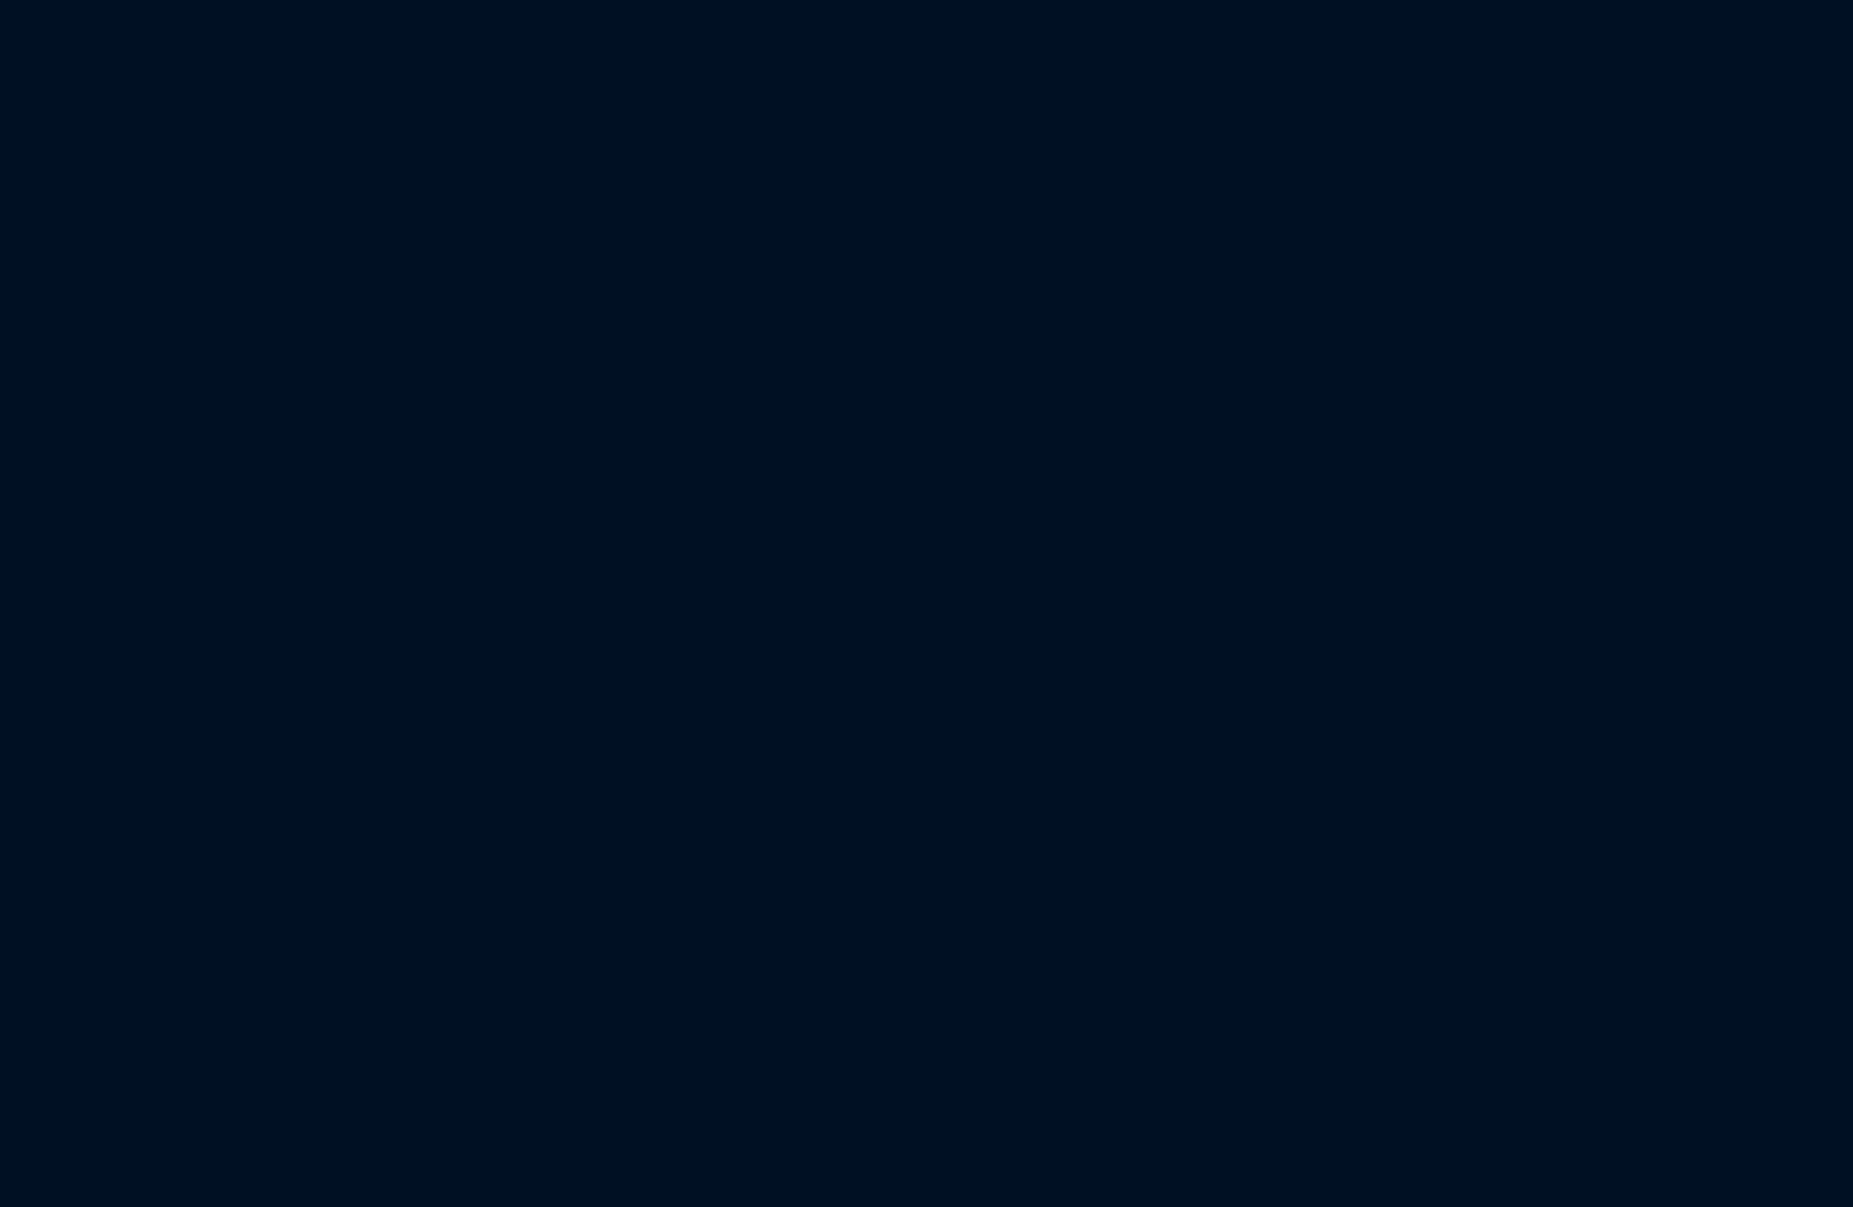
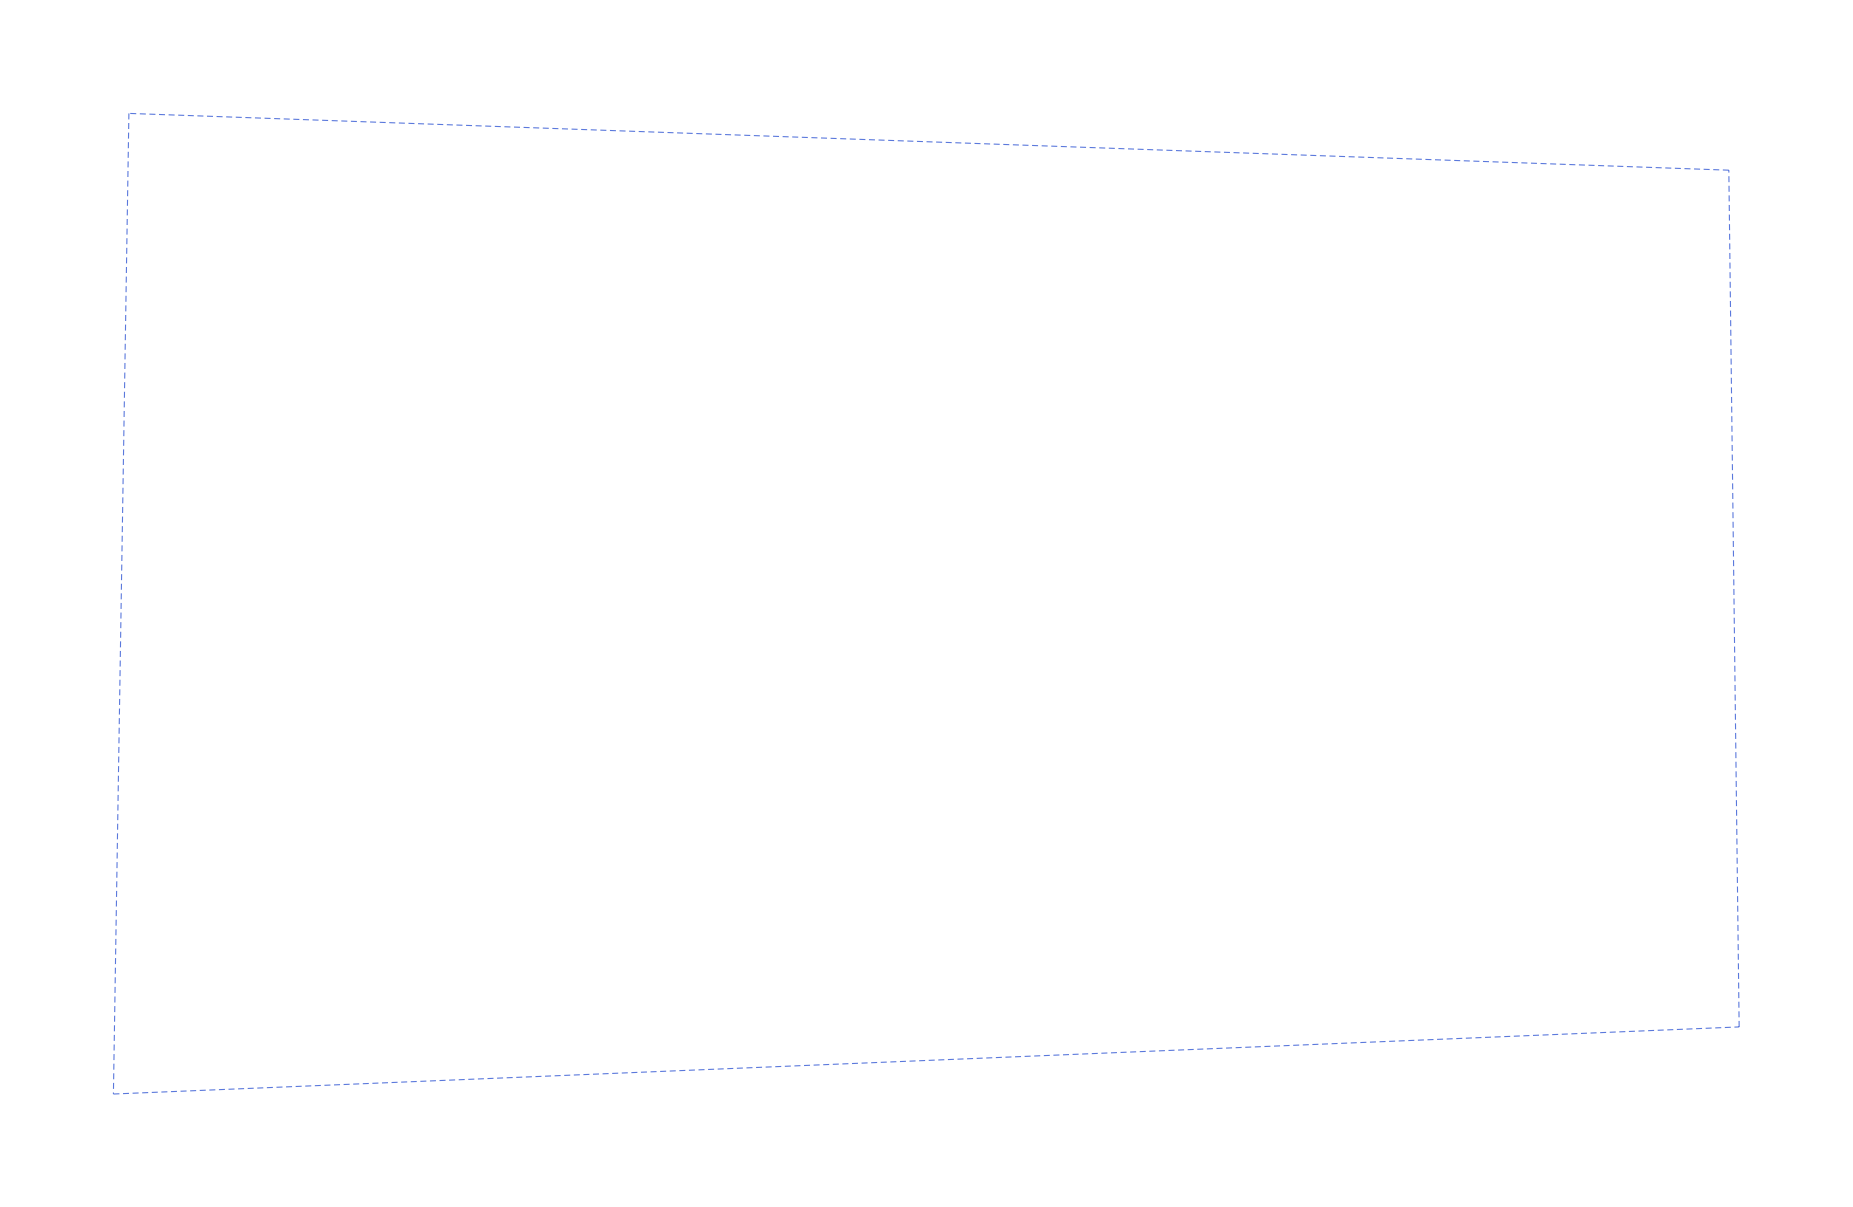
zone outline: none -> (128, 113) (1728, 170) (1739, 1026) (113, 1094) (128, 113)

